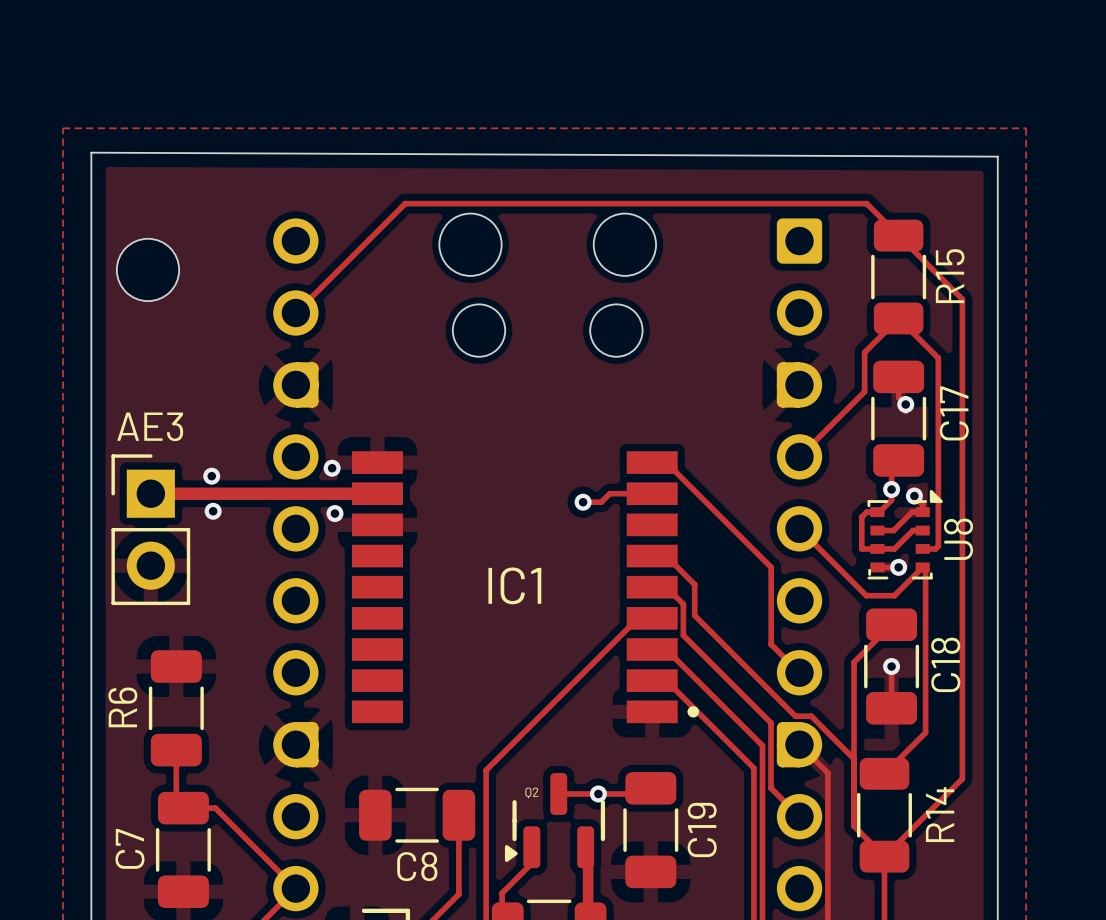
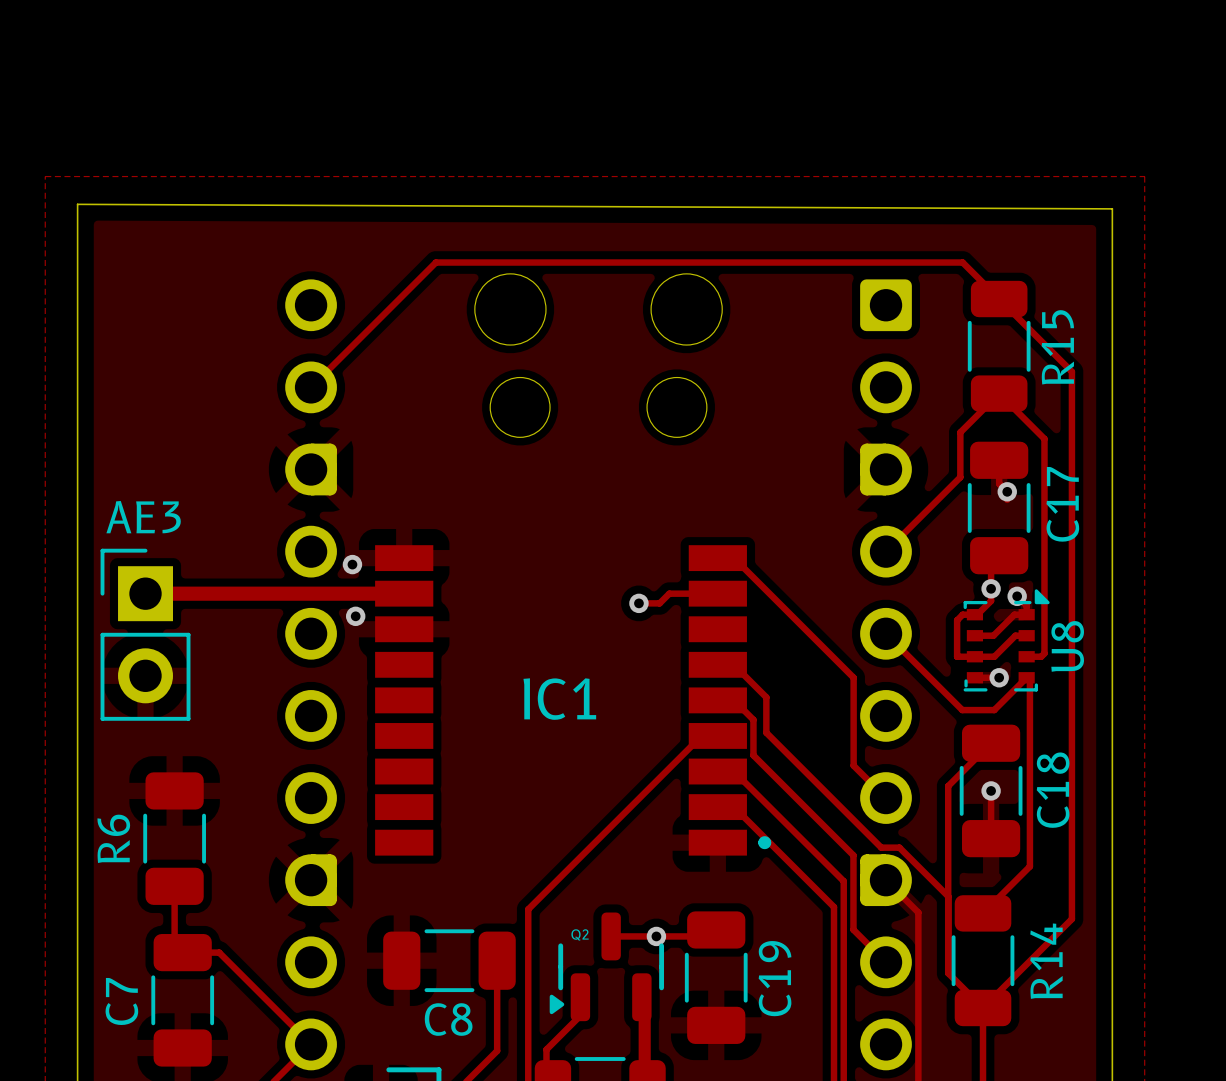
part: (148, 269) -> none
via: (211, 476) -> none
via: (213, 511) -> none

